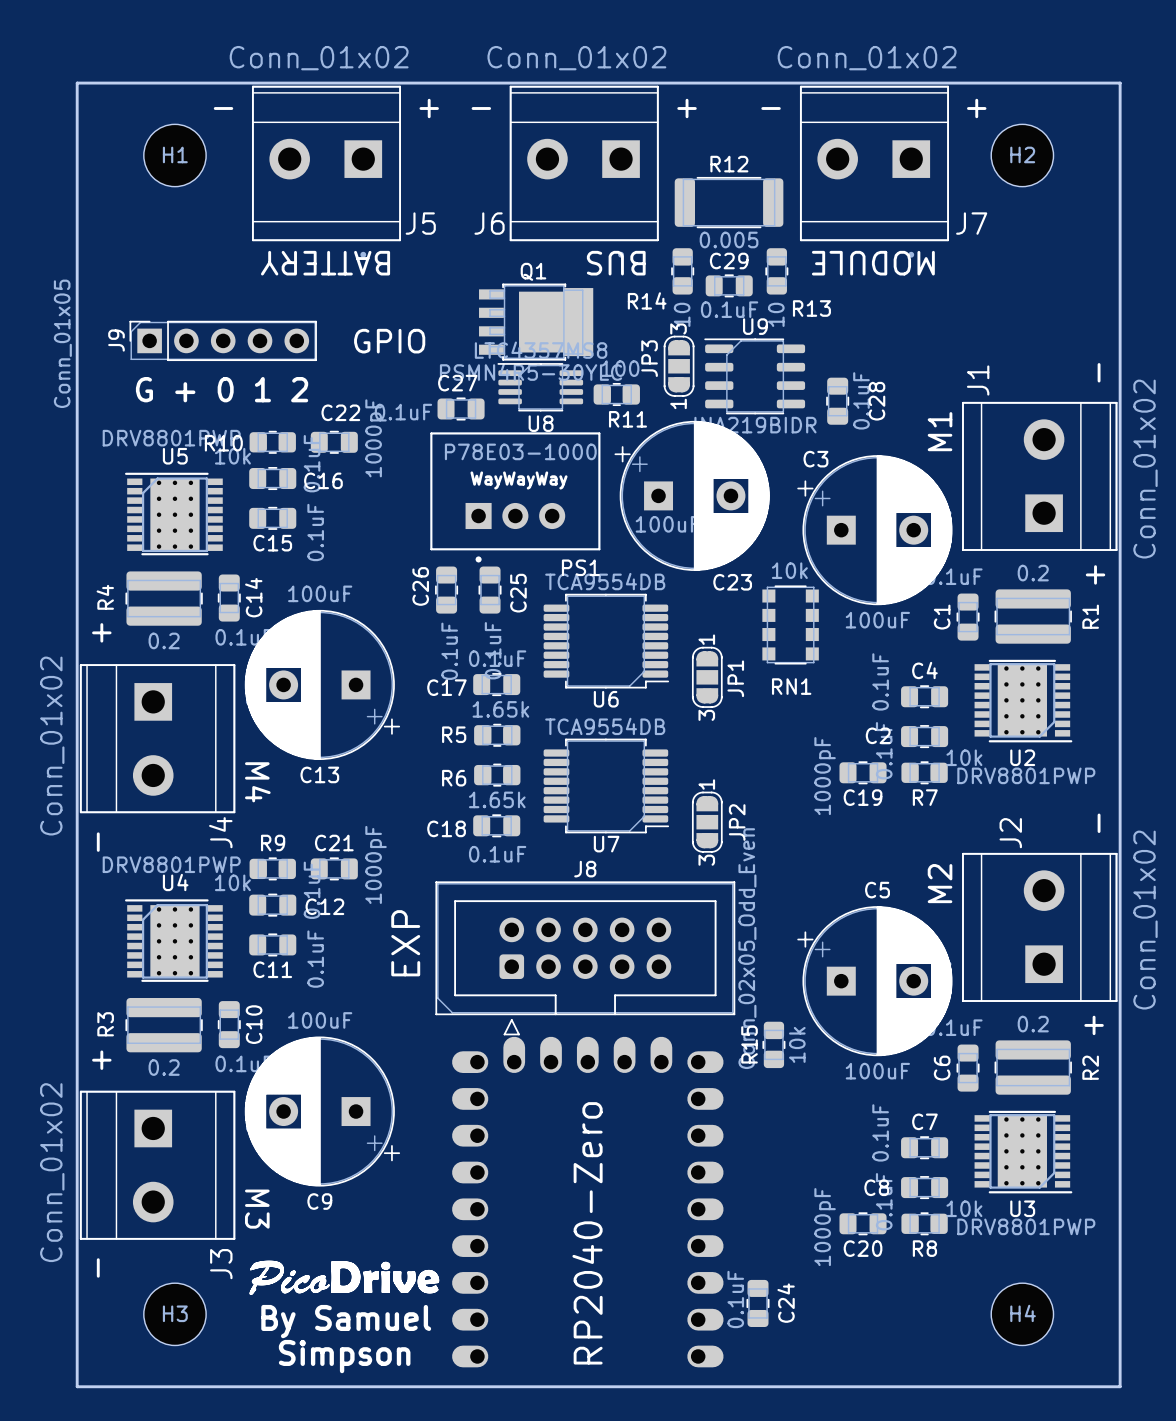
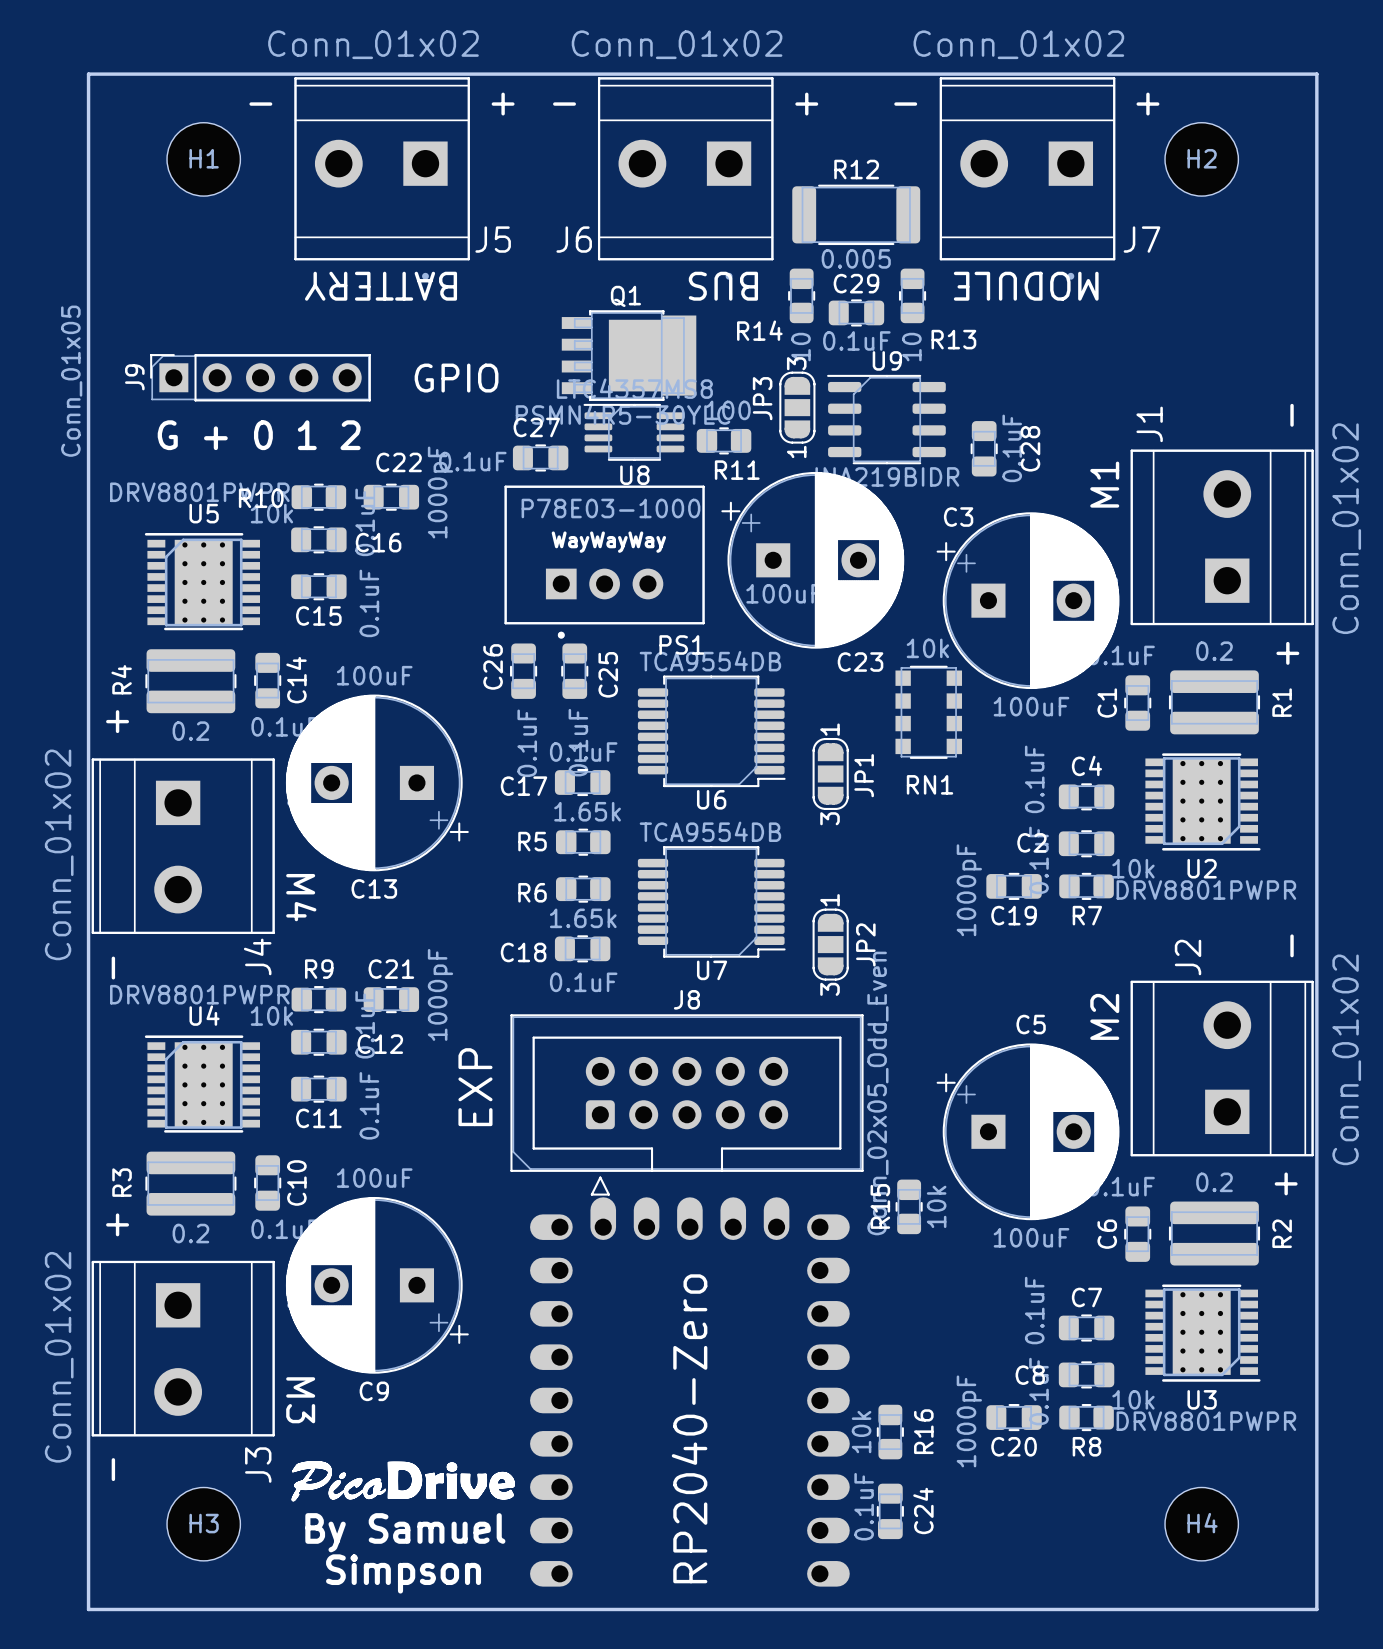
U5 value: DRV8801PWP (171, 438) -> DRV8801PWPR (199, 492)
U2 value: DRV8801PWP (1026, 775) -> DRV8801PWPR (1206, 890)
U4 value: DRV8801PWP (171, 864) -> DRV8801PWPR (199, 994)
U3 value: DRV8801PWP (1026, 1226) -> DRV8801PWPR (1206, 1421)
R16: none -> 10k (890, 1432)

